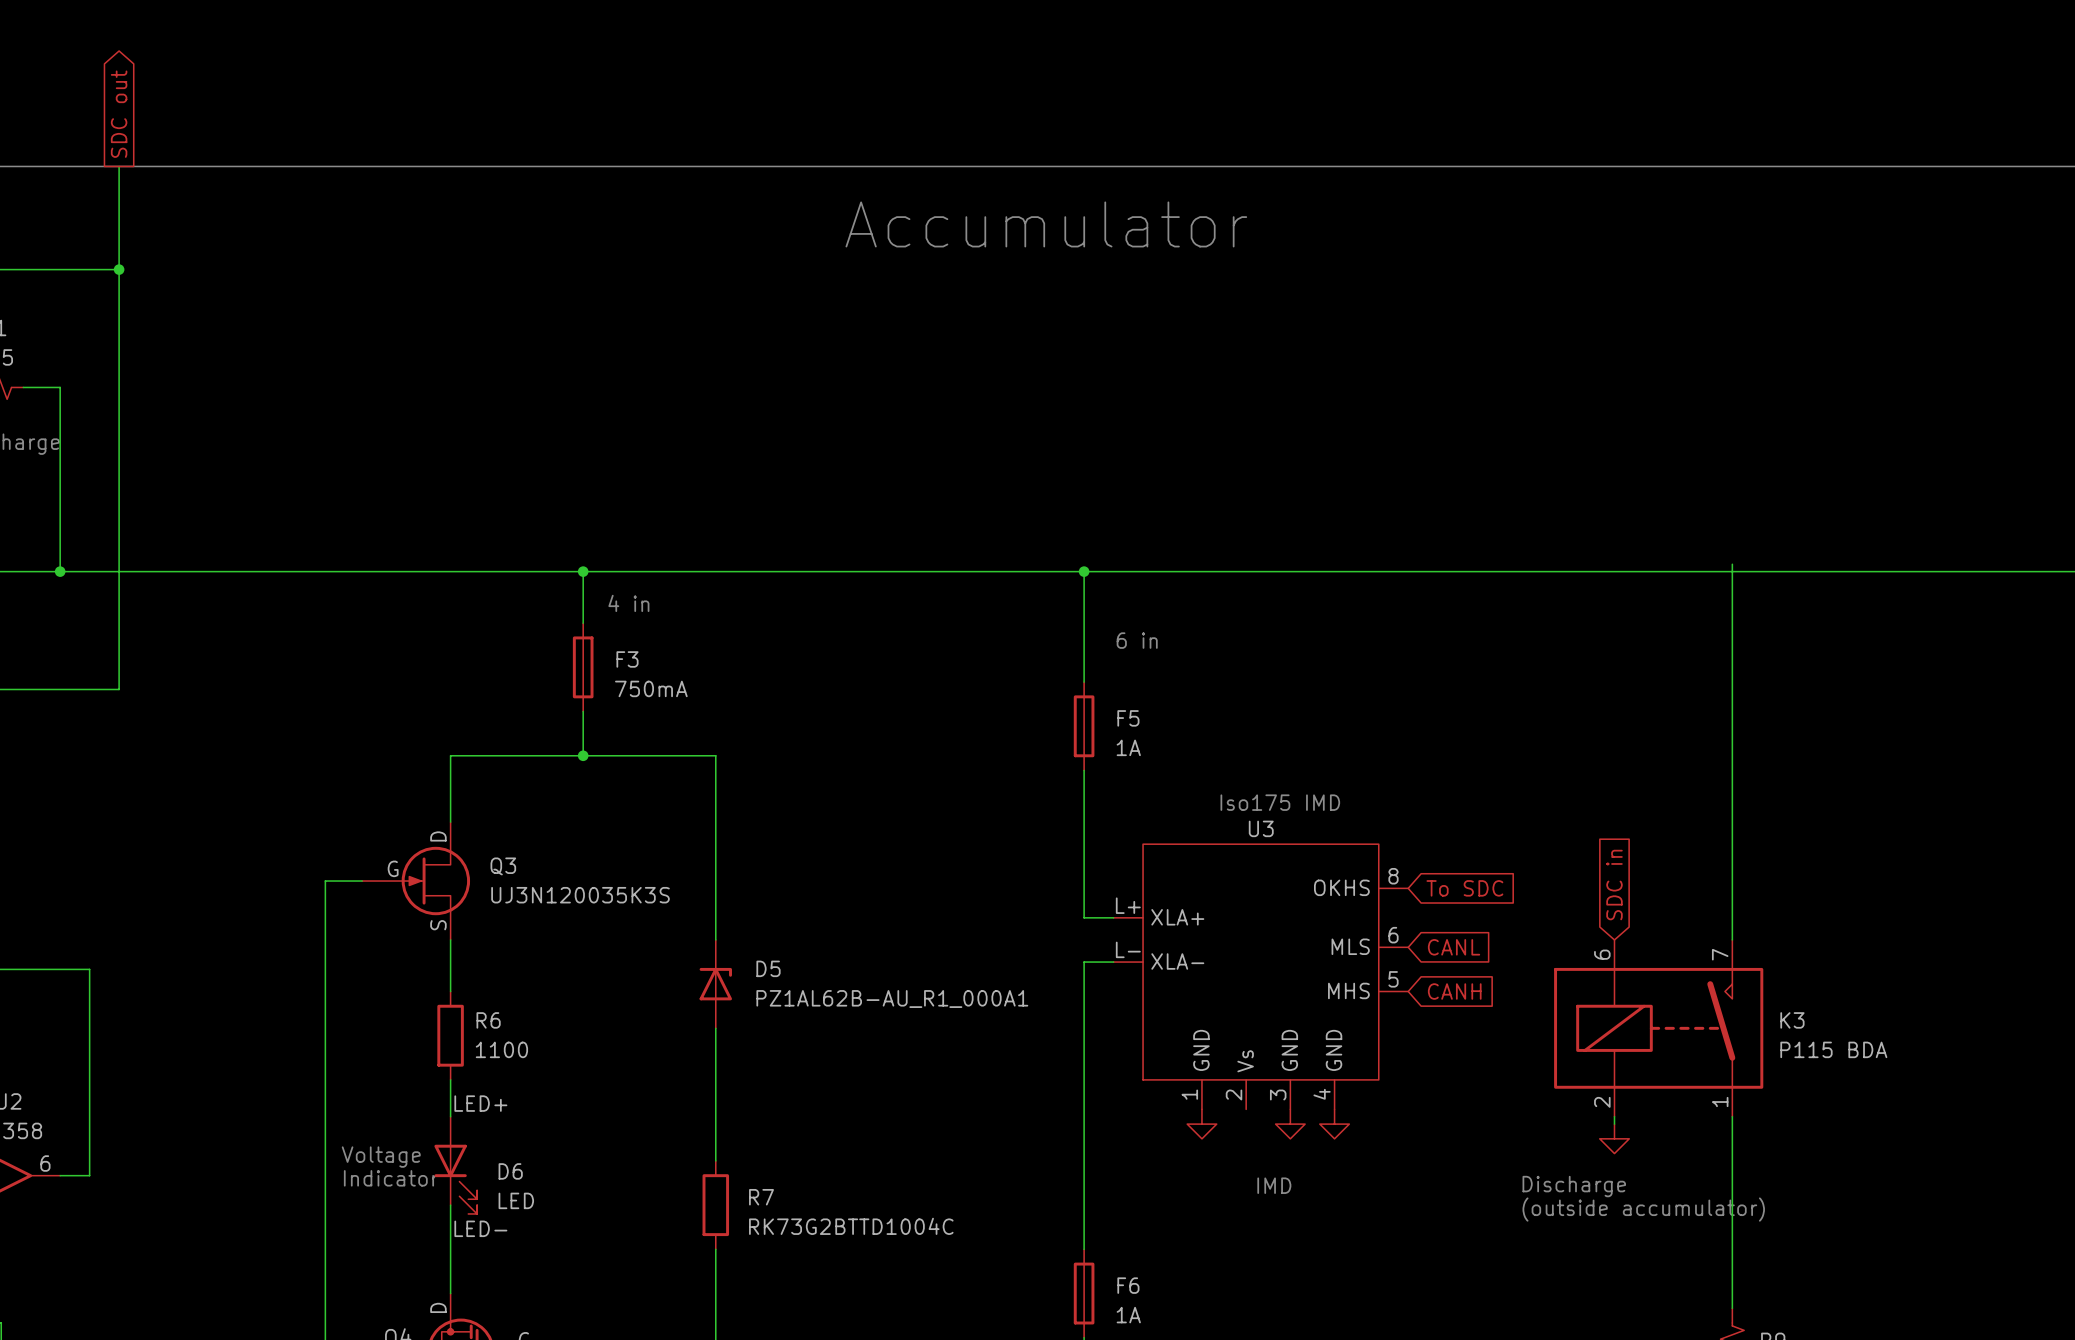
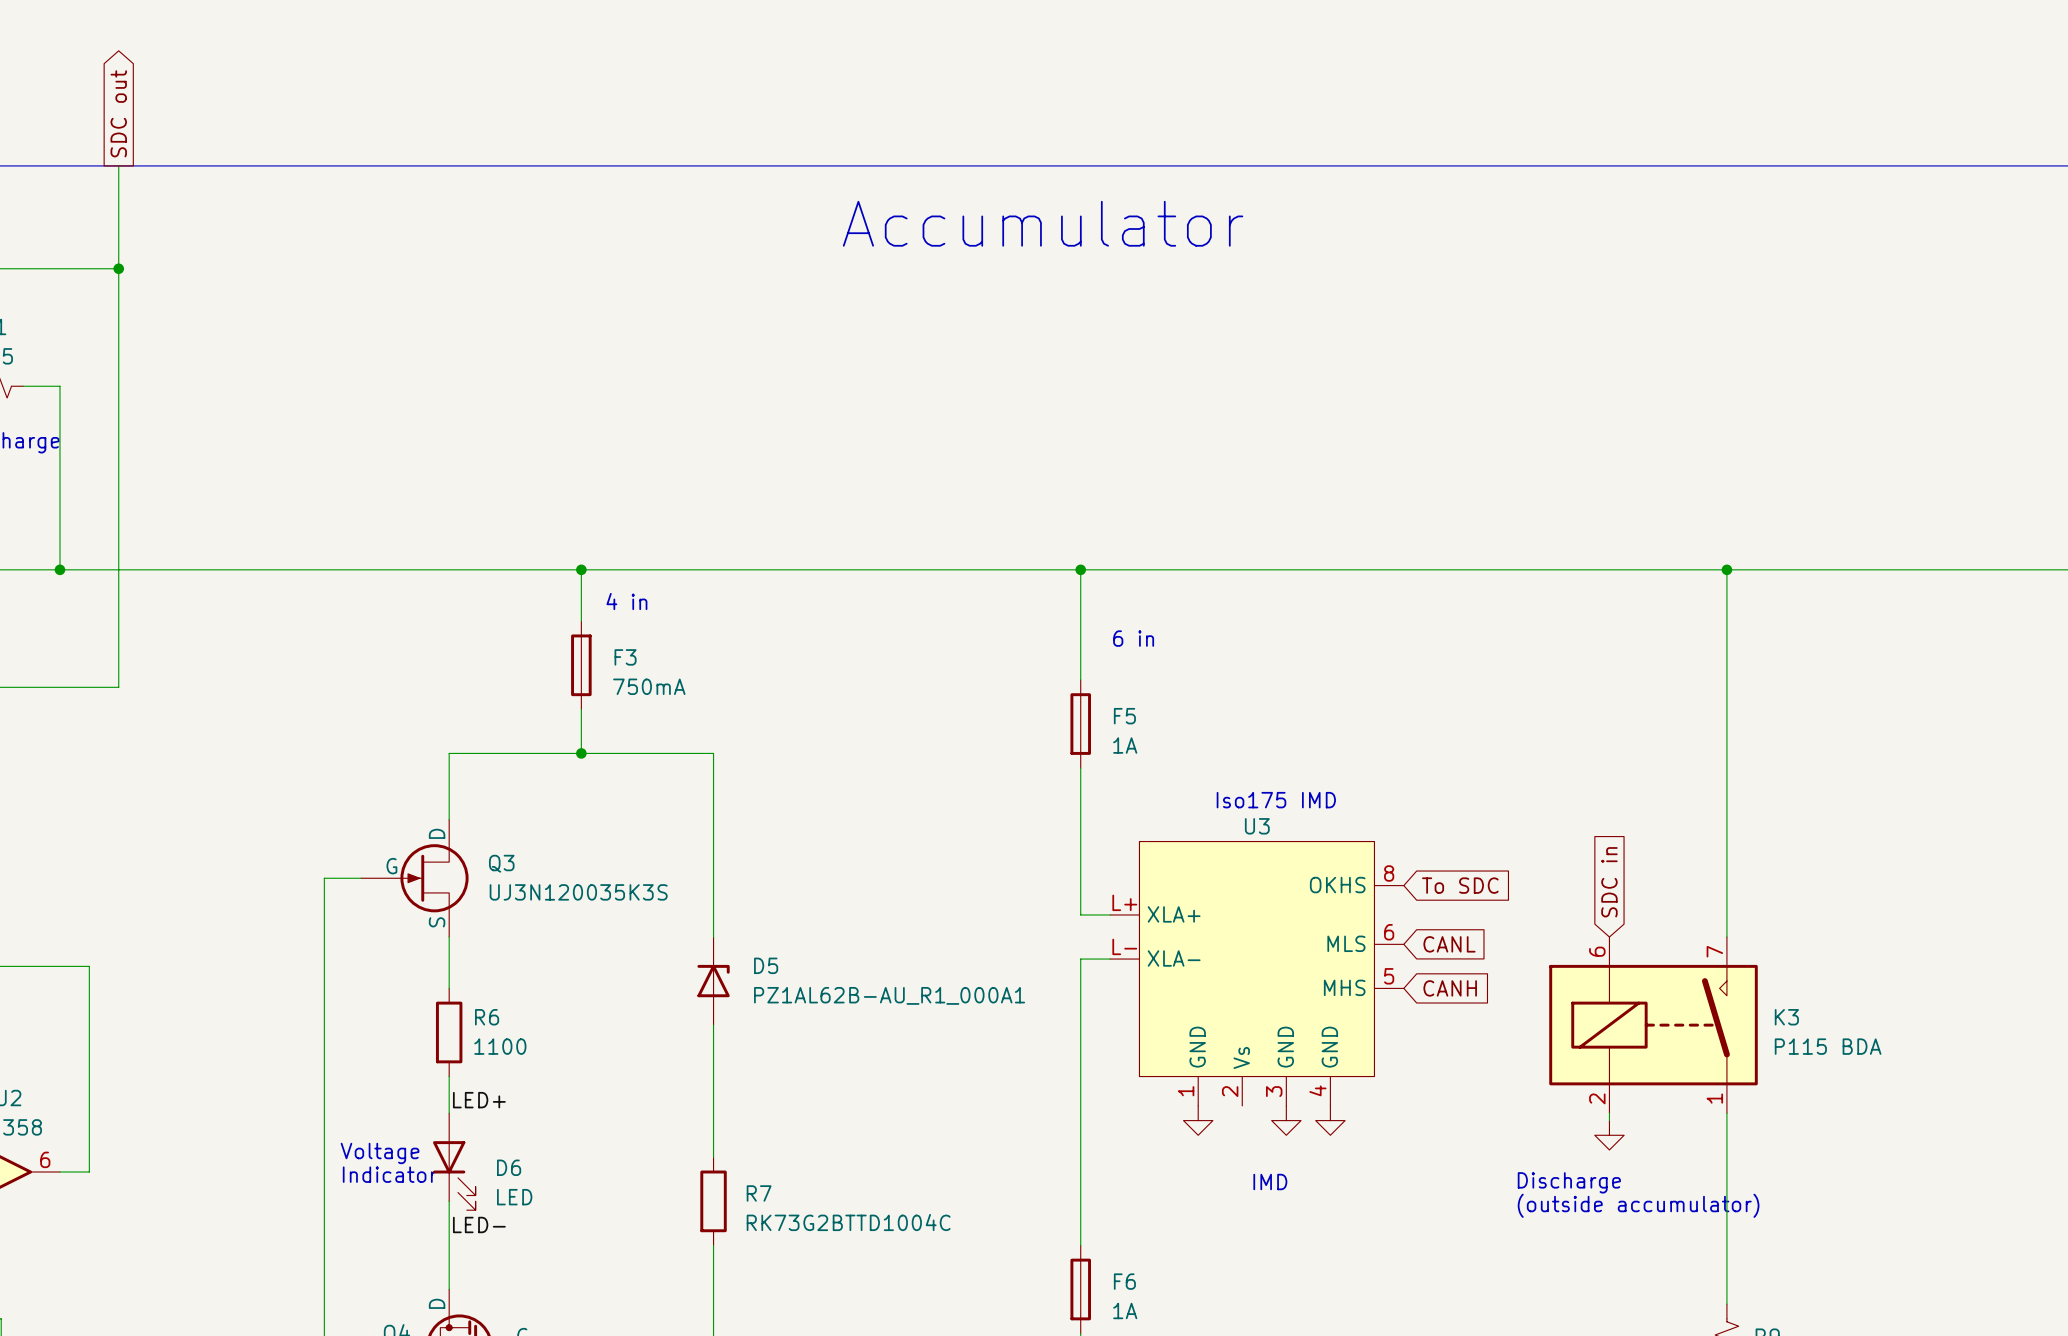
junction: none -> (1726, 569)

